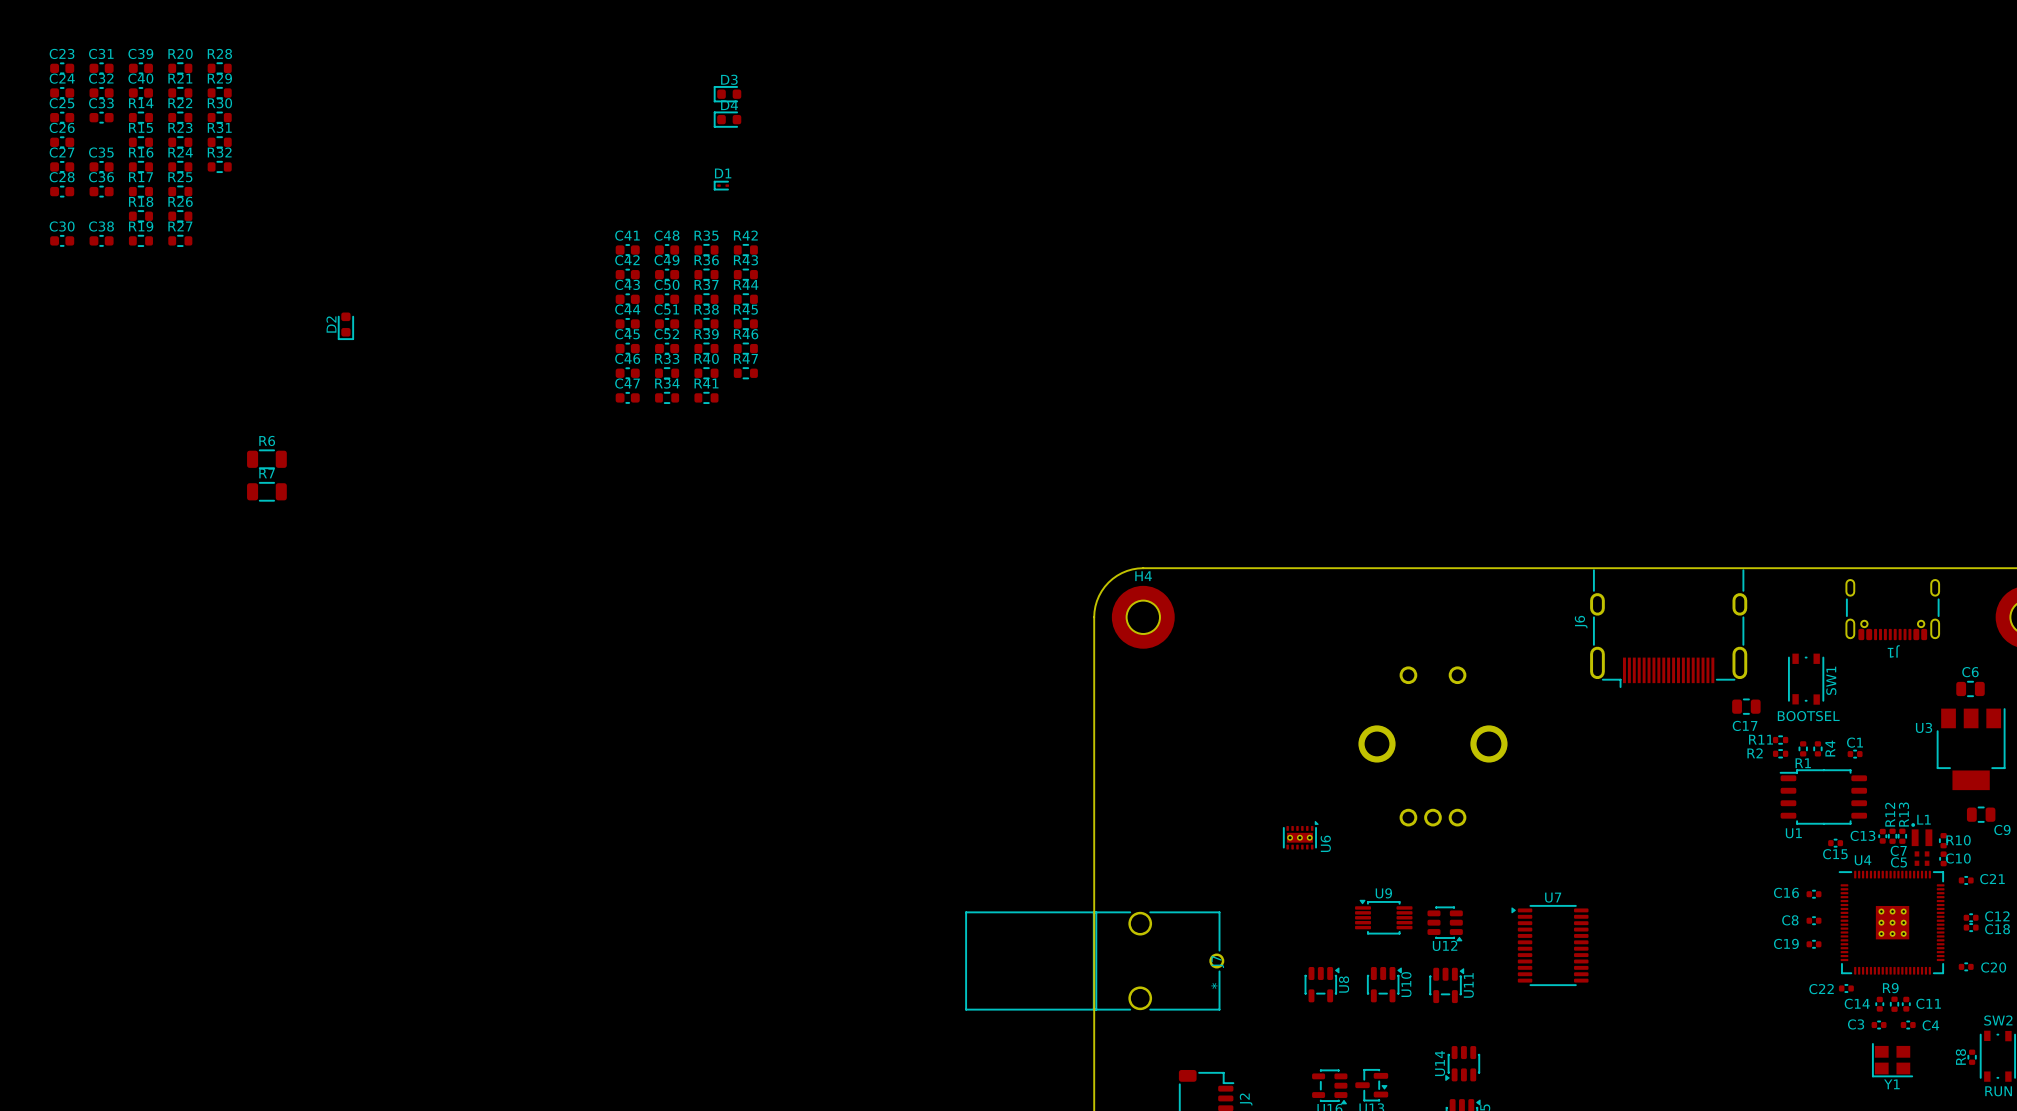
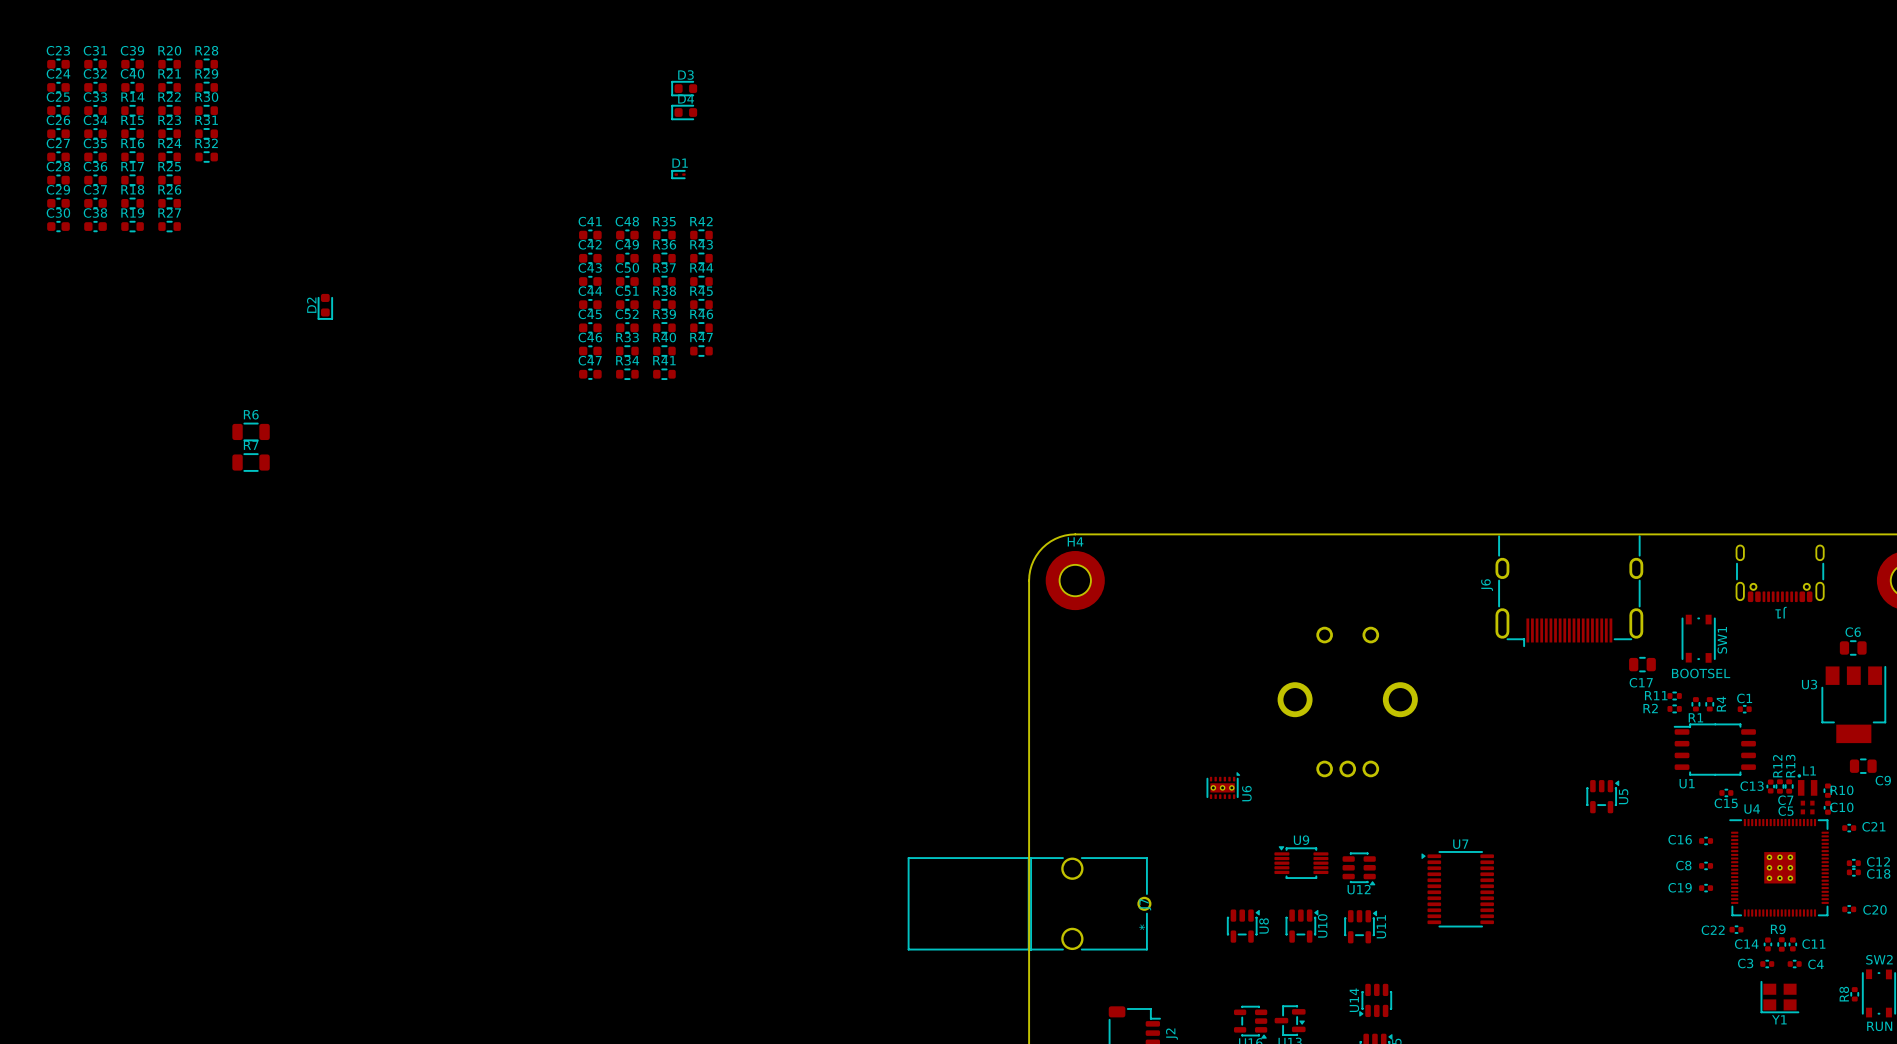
C34: none -> (95, 133)
C29: none -> (58, 203)
C37: none -> (95, 203)
U5: none -> (1602, 796)

